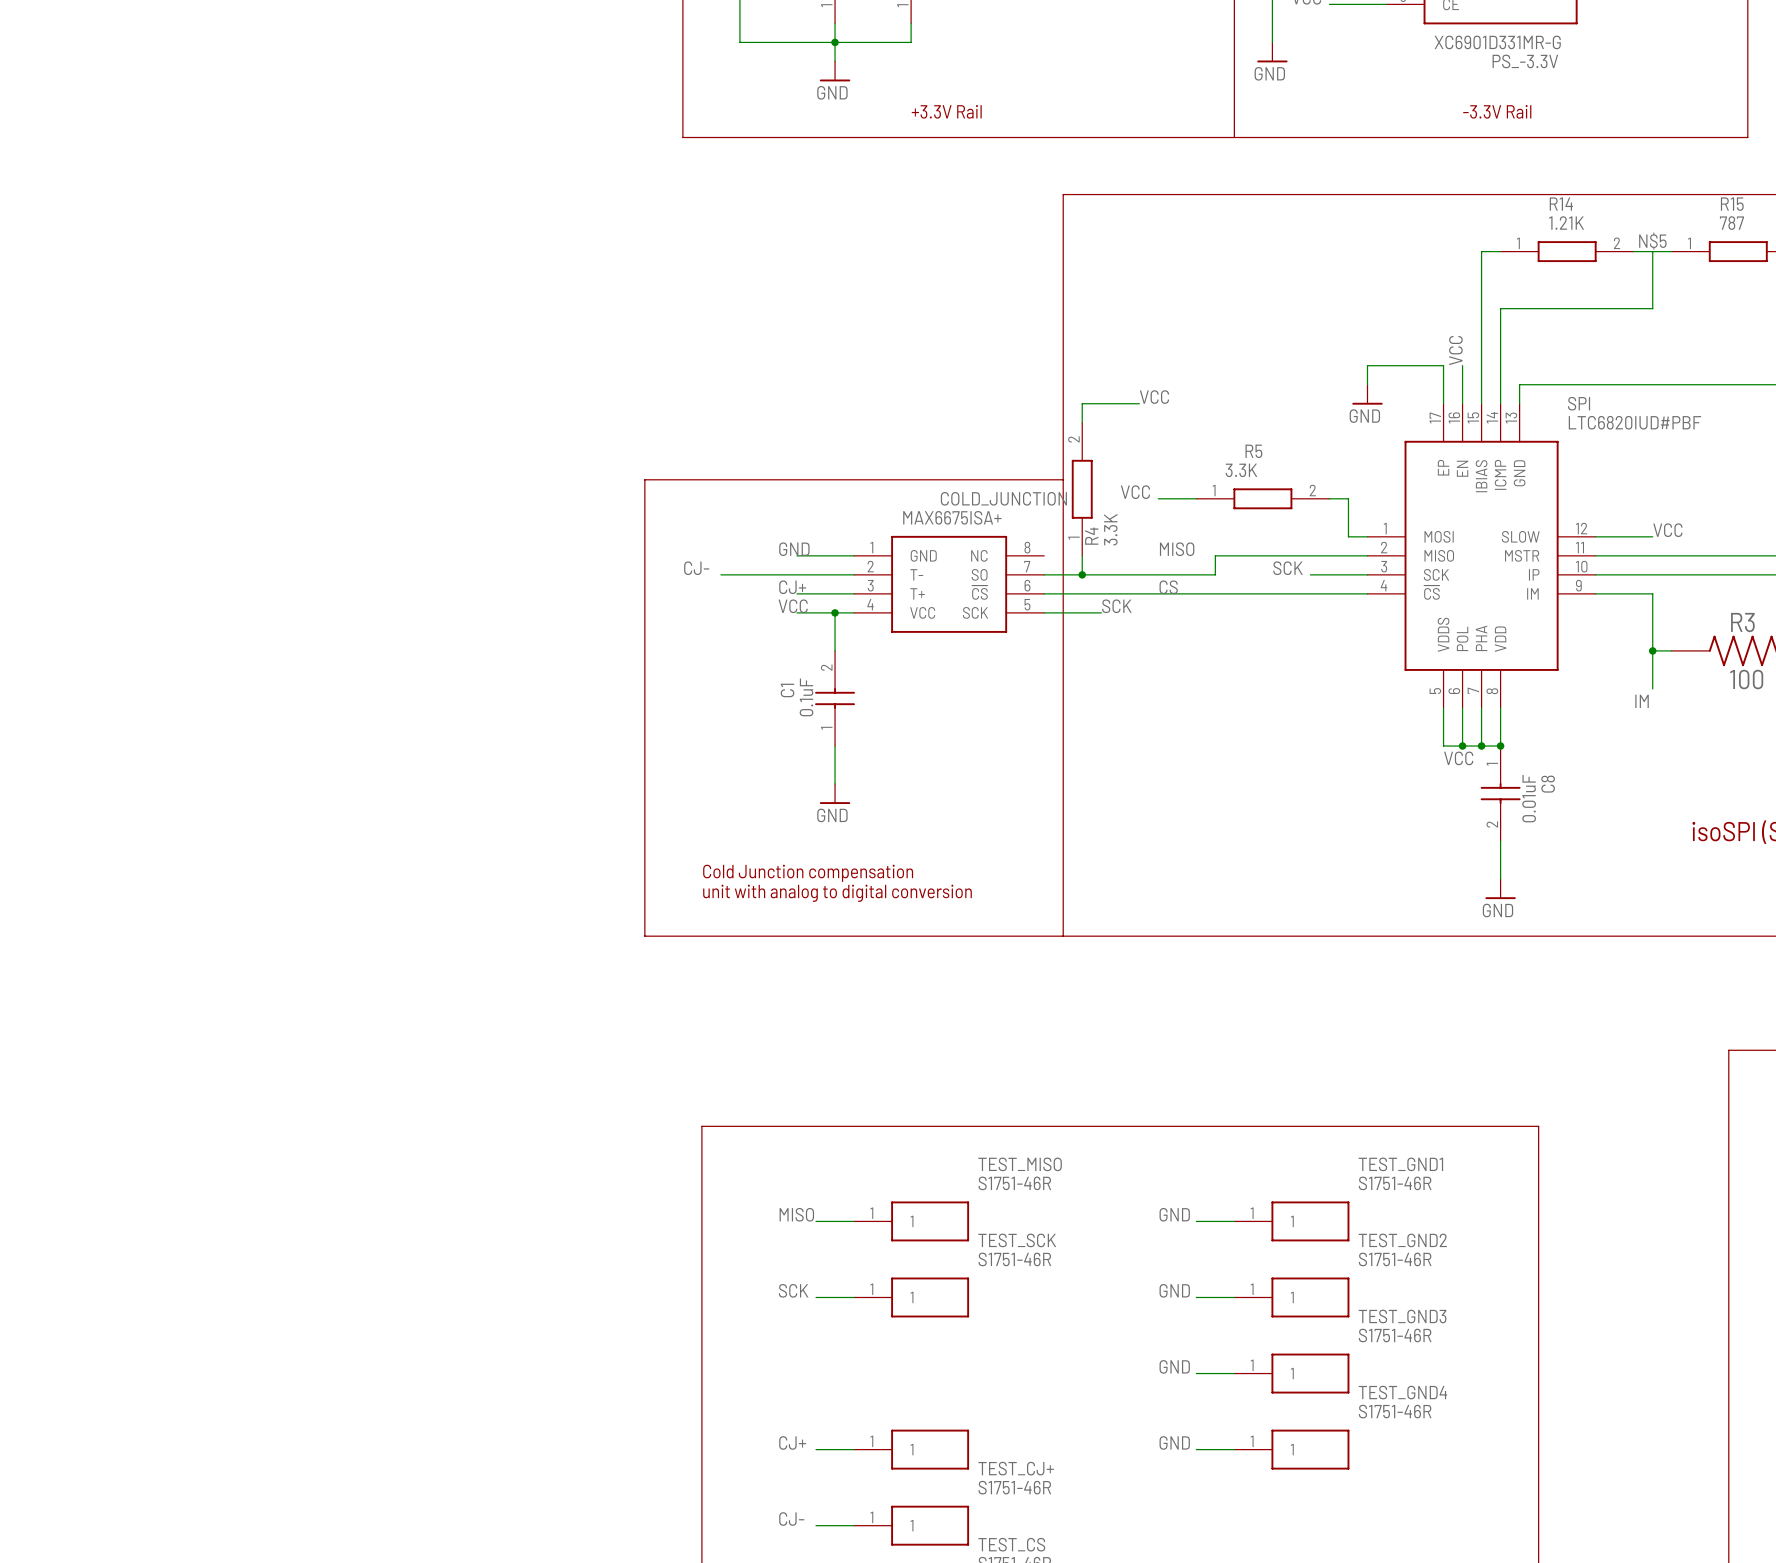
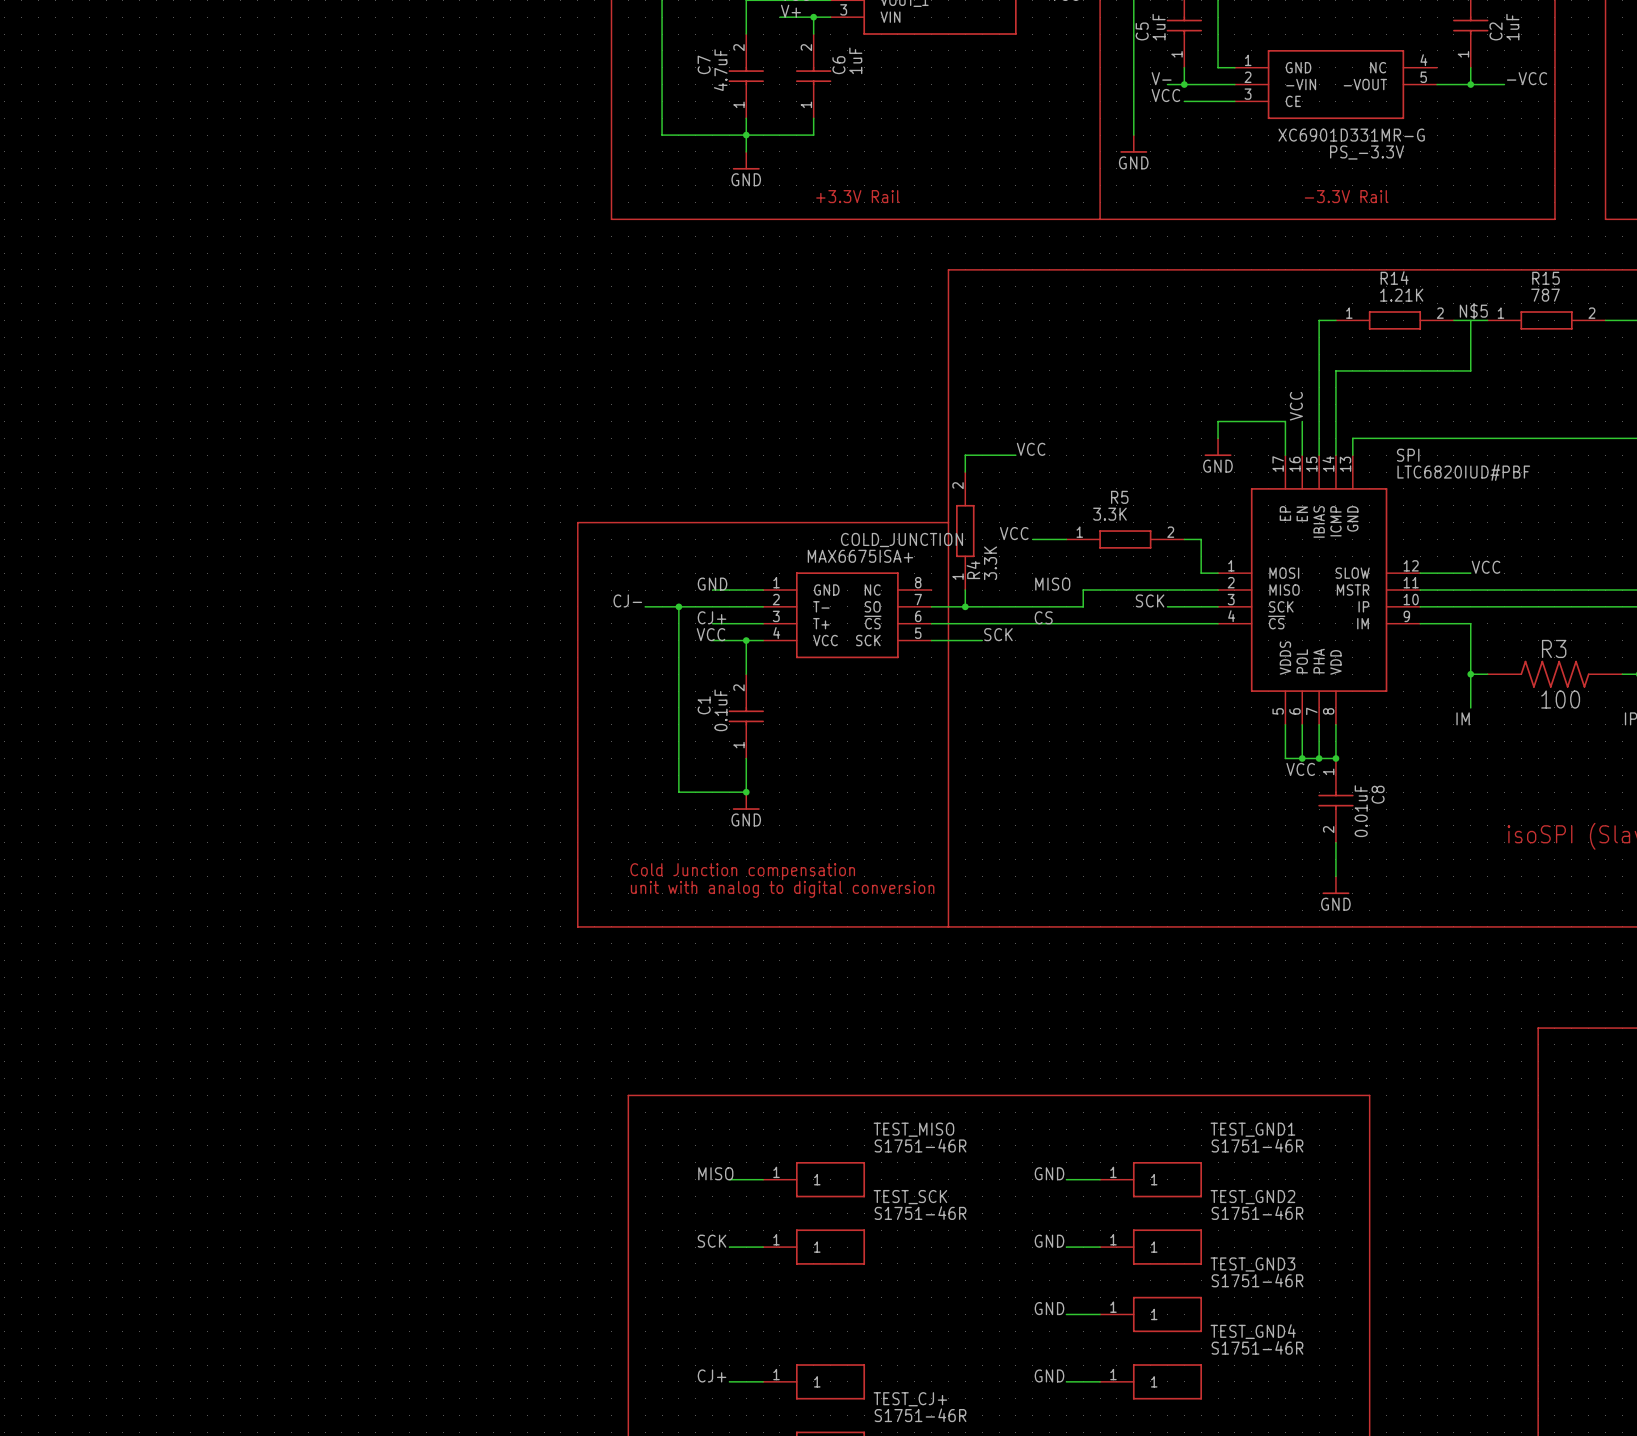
wire: none -> (678, 606) (678, 792) (746, 792)
junction: none -> (678, 606)
junction: none -> (746, 792)

